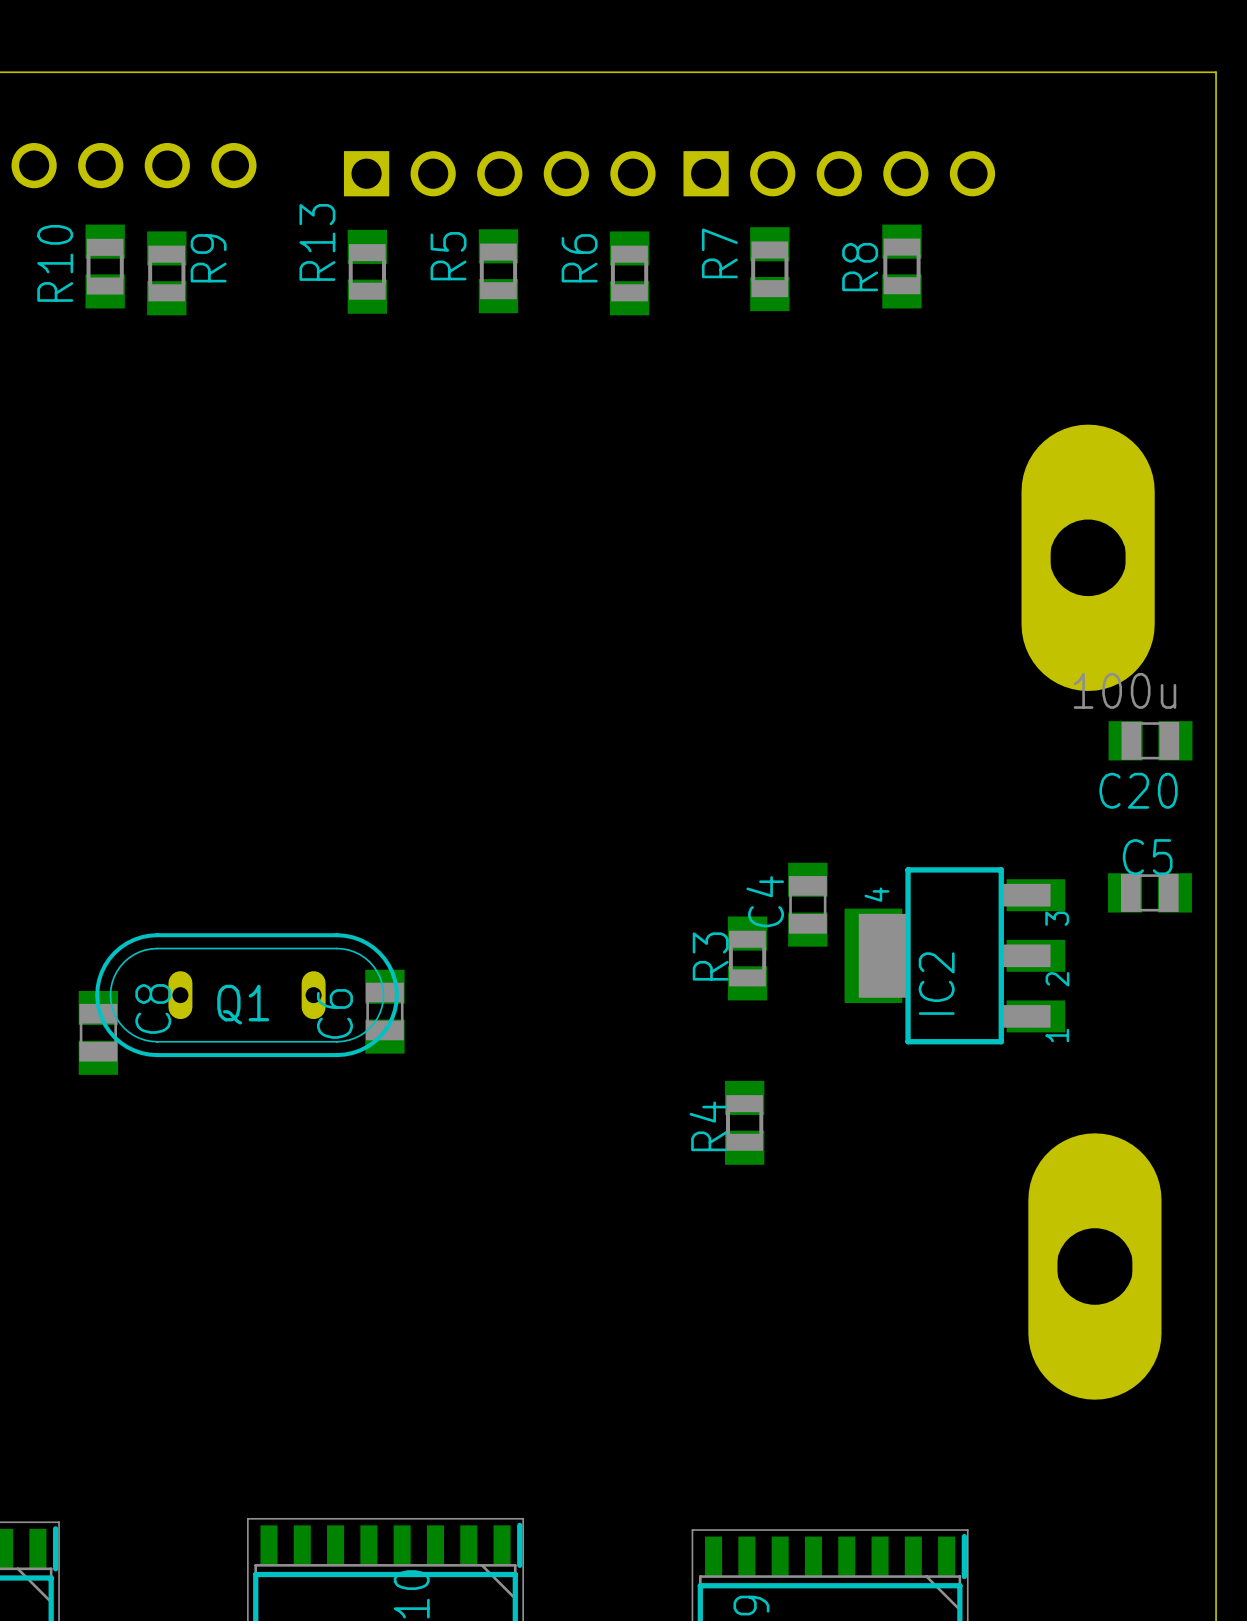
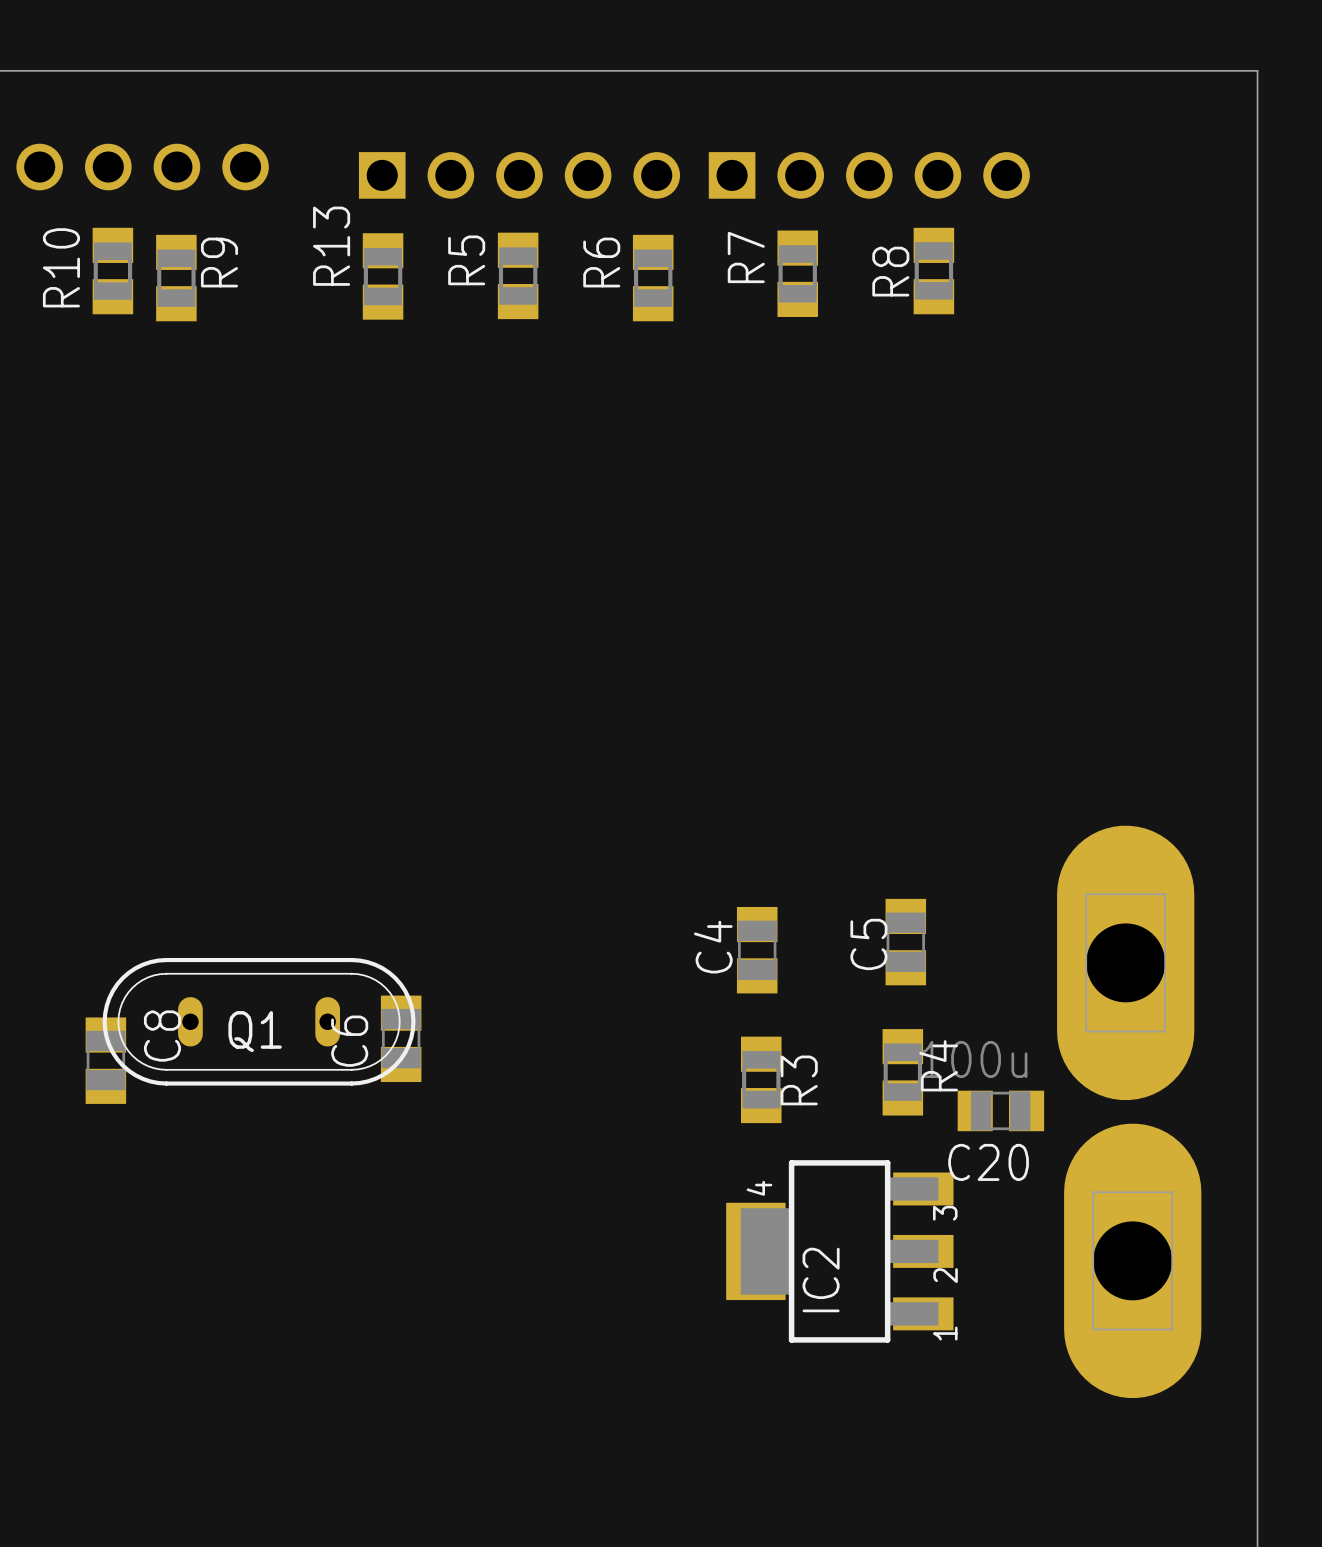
part: (1088, 557) -> none
C20 position: (1150, 740) -> (1000, 1110)
C5 rotation: 0° (1149, 892) -> 90° clockwise (905, 942)
C5 position: (1149, 892) -> (905, 942)
C4 position: (807, 904) -> (757, 950)
part: none -> (1125, 962)
IC2 position: (954, 955) -> (839, 1251)
R3 name position: R3 (710, 956) -> R3 (799, 1080)
R3 position: (747, 958) -> (761, 1079)
R4 position: (744, 1122) -> (902, 1072)
R4 name position: R4 (708, 1126) -> R4 (938, 1065)
part position: (1094, 1266) -> (1132, 1260)

